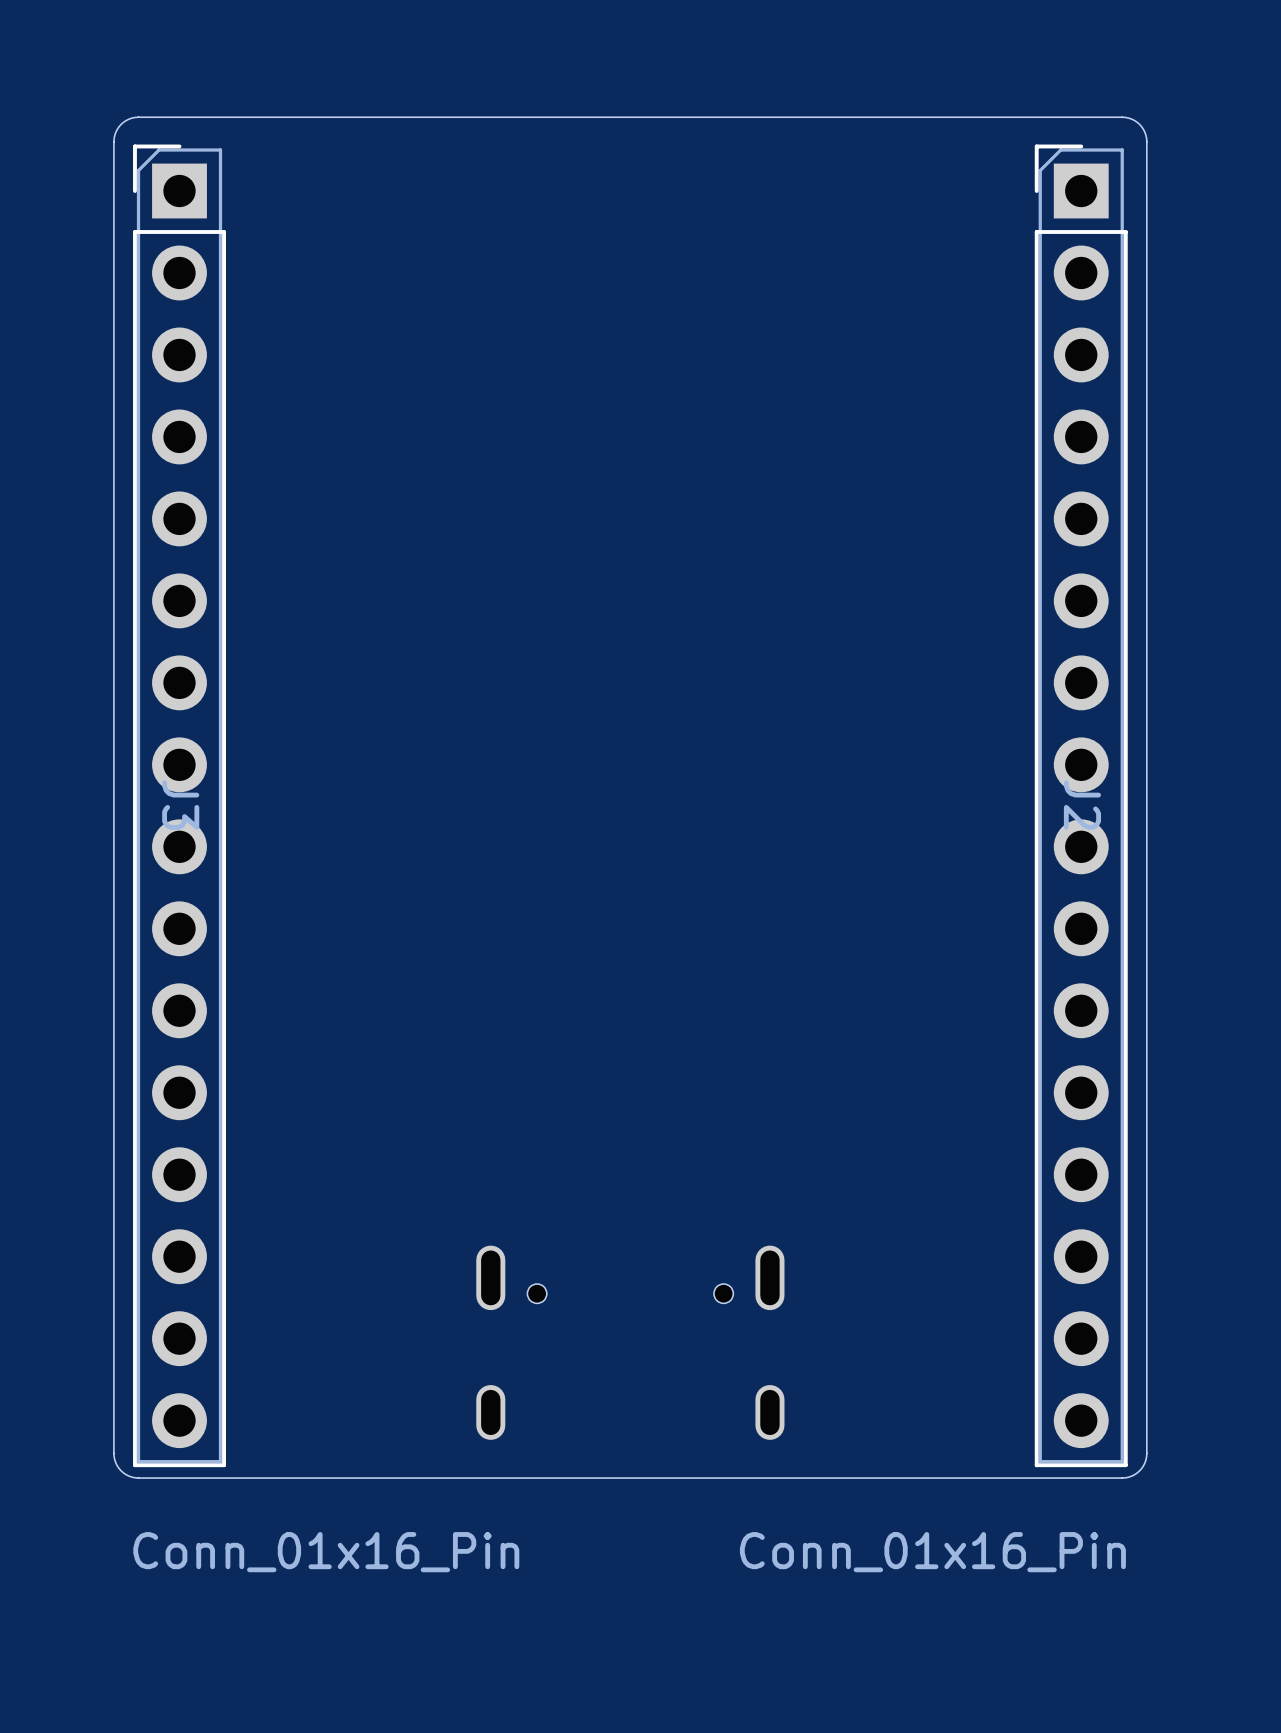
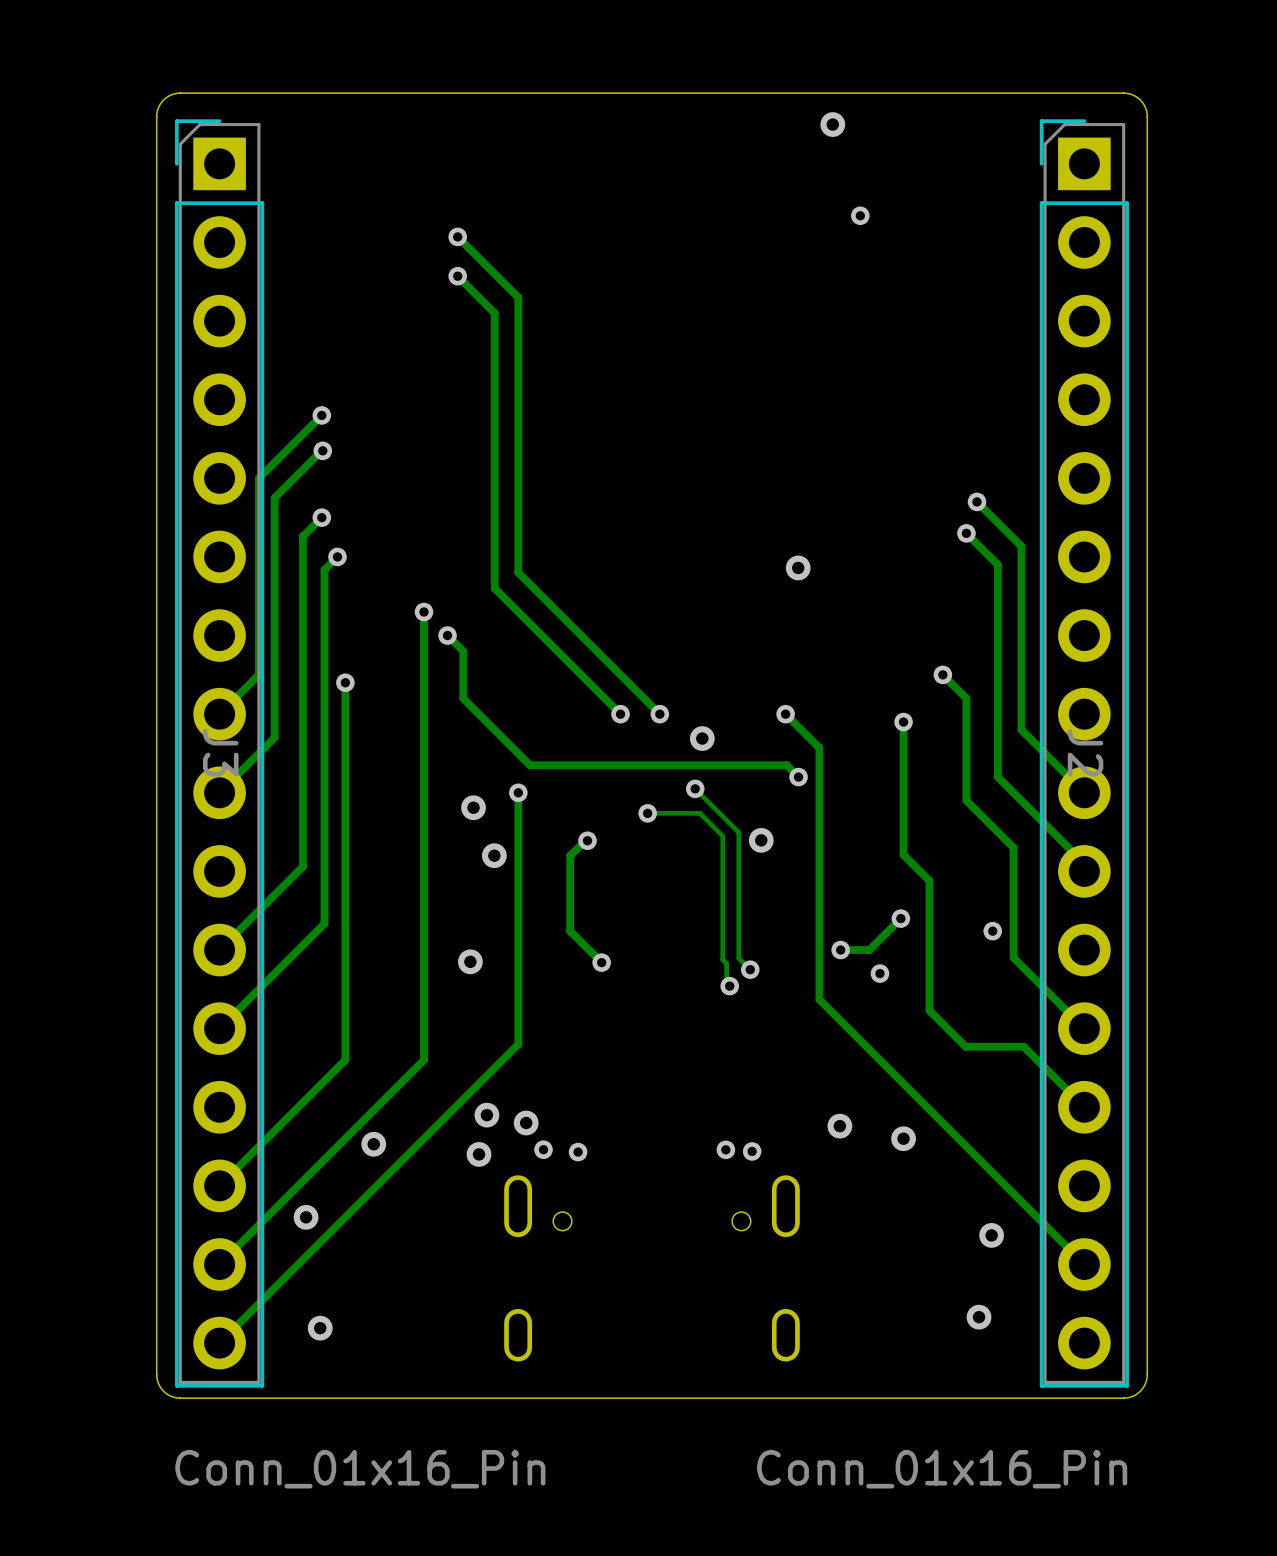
via: none -> (832, 124)
via: none -> (860, 215)
track: none -> (457, 236) (518, 297) (518, 572) (659, 714)
via: none -> (457, 236)
track: none -> (457, 276) (494, 313) (494, 588) (620, 714)
via: none -> (457, 276)
track: none -> (321, 415) (258, 478) (258, 674) (219, 714)
via: none -> (321, 415)
track: none -> (322, 450) (274, 497) (274, 737) (219, 792)
via: none -> (322, 450)
track: none -> (977, 501) (1021, 546) (1021, 729) (1084, 792)
via: none -> (977, 501)
track: none -> (321, 517) (302, 536) (302, 866) (219, 950)
via: none -> (321, 517)
track: none -> (966, 533) (997, 564) (997, 777) (1084, 863) (1084, 871)
via: none -> (966, 533)
track: none -> (337, 556) (324, 569) (324, 923) (219, 1028)
via: none -> (337, 556)
via: none -> (798, 567)
track: none -> (424, 611) (424, 1060) (219, 1264)
via: none -> (424, 611)
track: none -> (447, 635) (463, 651) (463, 698) (530, 765) (786, 765) (798, 777)
via: none -> (447, 635)
track: none -> (942, 674) (966, 698) (966, 800) (1013, 847) (1013, 957) (1084, 1028)
via: none -> (942, 674)
track: none -> (345, 682) (345, 1060) (219, 1185)
via: none -> (345, 682)
via: none -> (620, 714)
via: none -> (659, 714)
track: none -> (785, 714) (819, 747) (819, 999) (1084, 1264)
via: none -> (785, 714)
track: none -> (903, 722) (903, 854) (929, 880) (929, 1010) (965, 1046) (1023, 1046) (1084, 1107)
via: none -> (903, 722)
via: none -> (702, 738)
via: none -> (798, 777)
track: none -> (695, 788) (738, 832) (738, 958) (750, 969)
via: none -> (695, 788)
track: none -> (518, 792) (518, 1044) (219, 1343)
via: none -> (518, 792)
via: none -> (473, 807)
track: none -> (647, 813) (700, 813) (722, 836) (722, 959) (726, 963) (726, 980) (729, 986)
via: none -> (647, 813)
track: none -> (587, 840) (585, 840) (570, 855) (570, 931) (601, 962)
via: none -> (587, 840)
via: none -> (761, 840)
via: none -> (494, 855)
track: none -> (900, 918) (869, 950) (840, 950)
via: none -> (900, 918)
via: none -> (992, 931)
via: none -> (840, 950)
via: none -> (470, 961)
via: none -> (601, 962)
via: none -> (750, 969)
via: none -> (879, 973)
via: none -> (729, 986)
via: none -> (486, 1115)
via: none -> (526, 1122)
via: none -> (839, 1126)
via: none -> (903, 1138)
via: none -> (373, 1144)
via: none -> (543, 1149)
via: none -> (725, 1149)
via: none -> (752, 1151)
via: none -> (578, 1152)
via: none -> (479, 1154)
via: none -> (306, 1217)
via: none -> (991, 1235)
via: none -> (979, 1317)
via: none -> (320, 1328)

